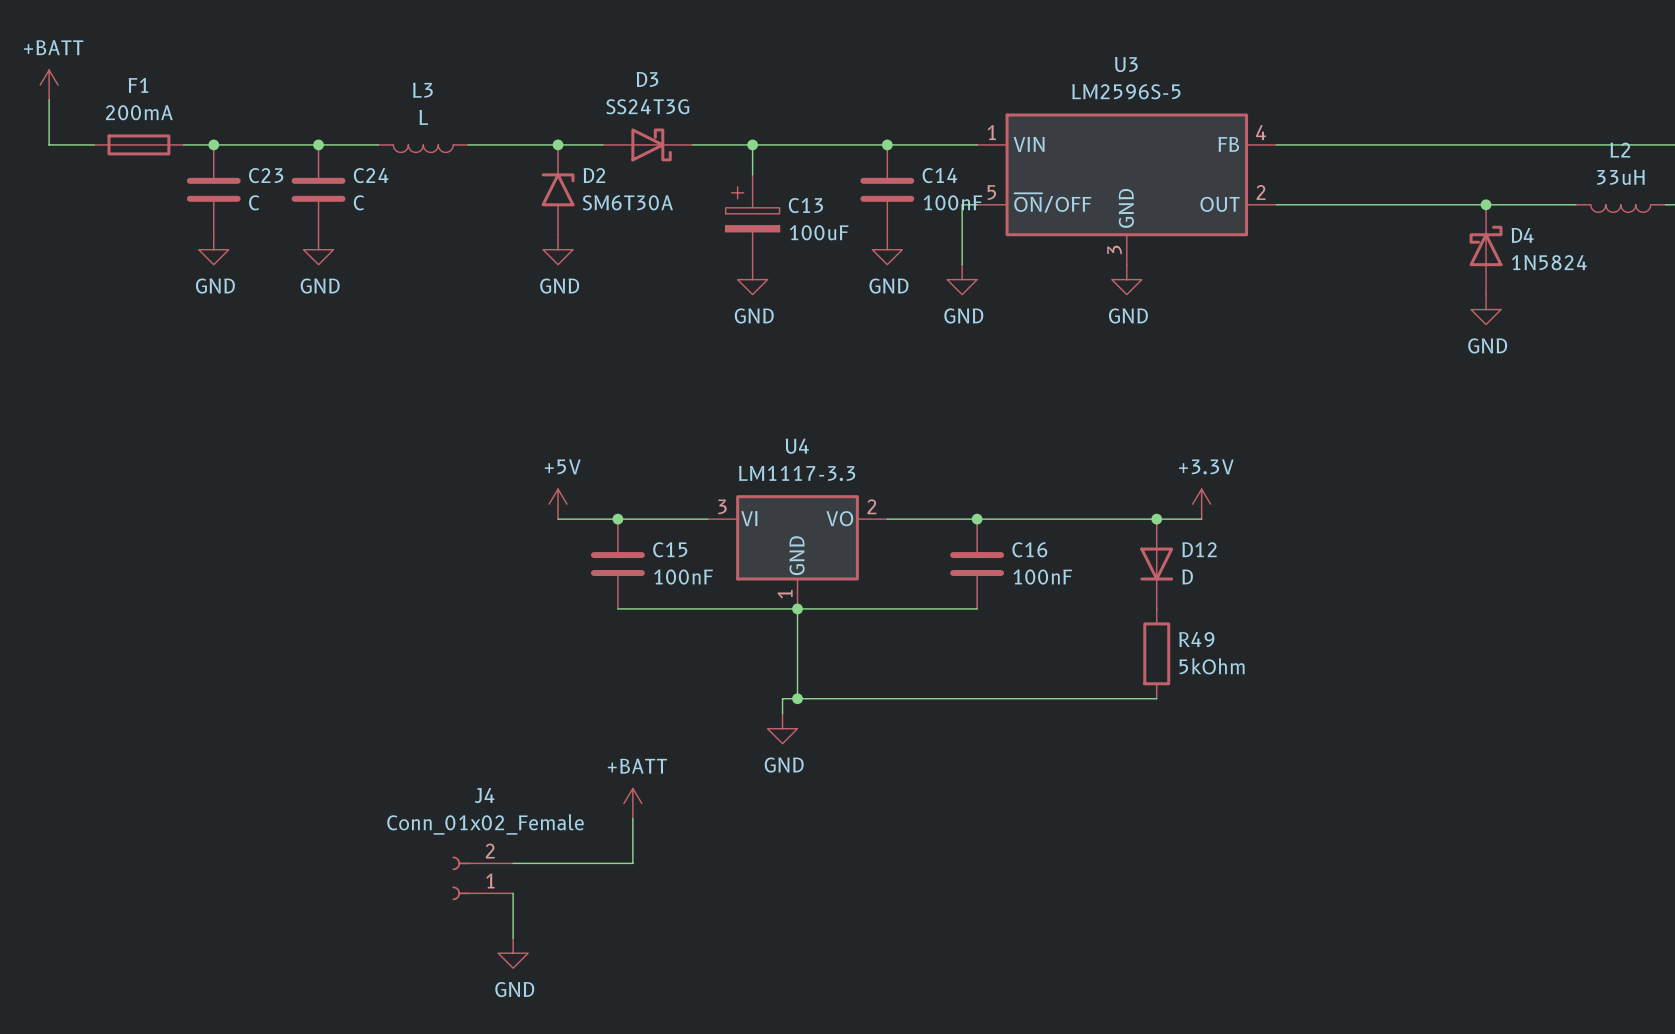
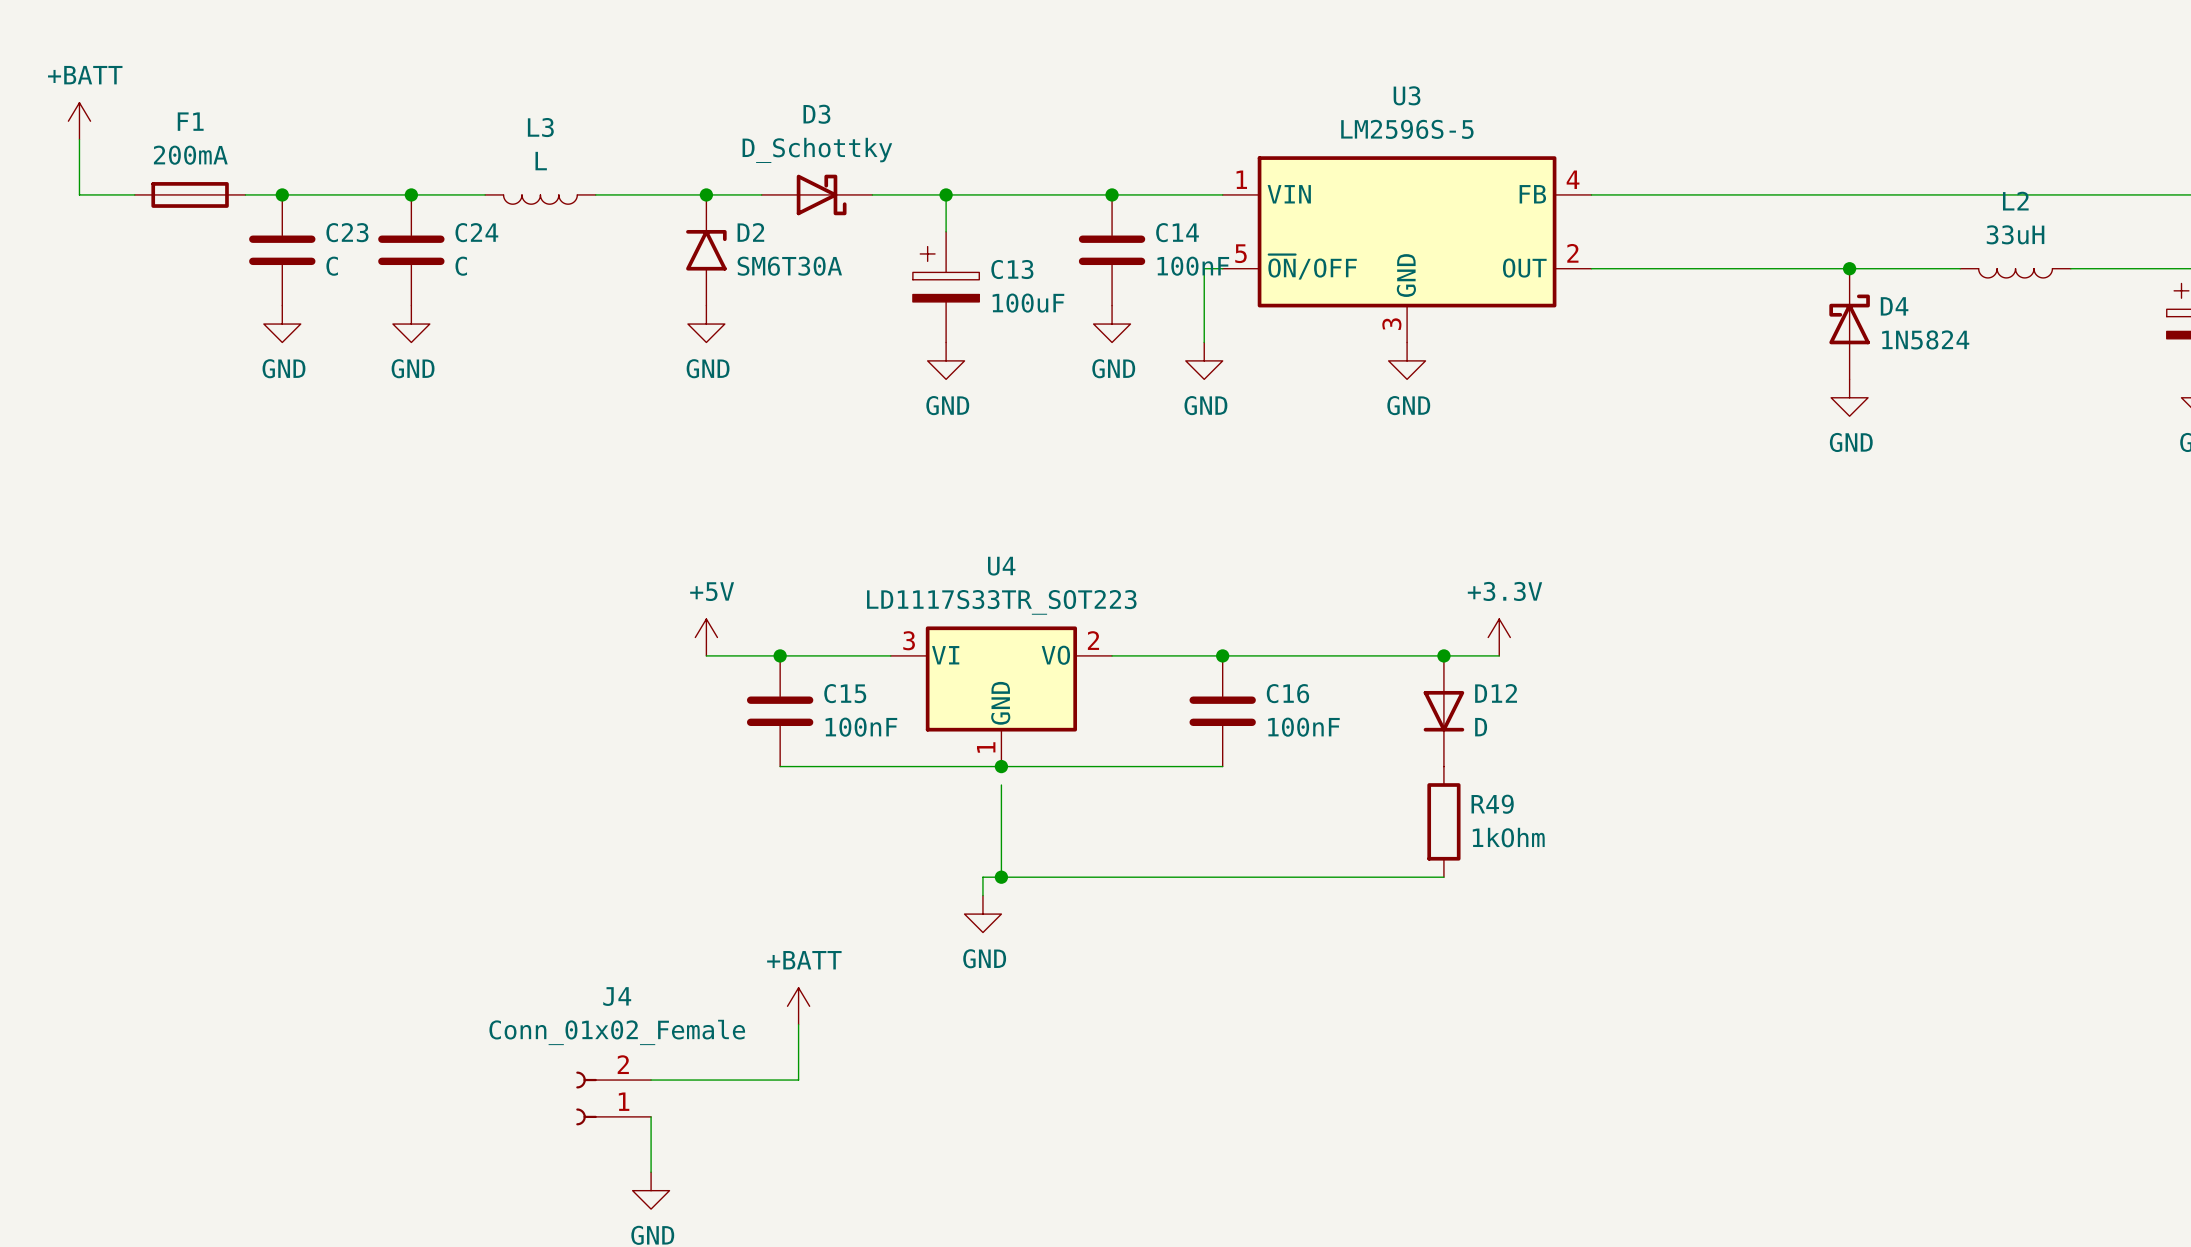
D3 value: SS24T3G (647, 106) -> D_Schottky (817, 150)
U4 value: LM1117-3.3 (797, 473) -> LD1117S33TR_SOT223 (1001, 602)
wire: (797, 608) (797, 623) -> none
R49 value: 5kOhm (1212, 666) -> 1kOhm (1508, 837)

